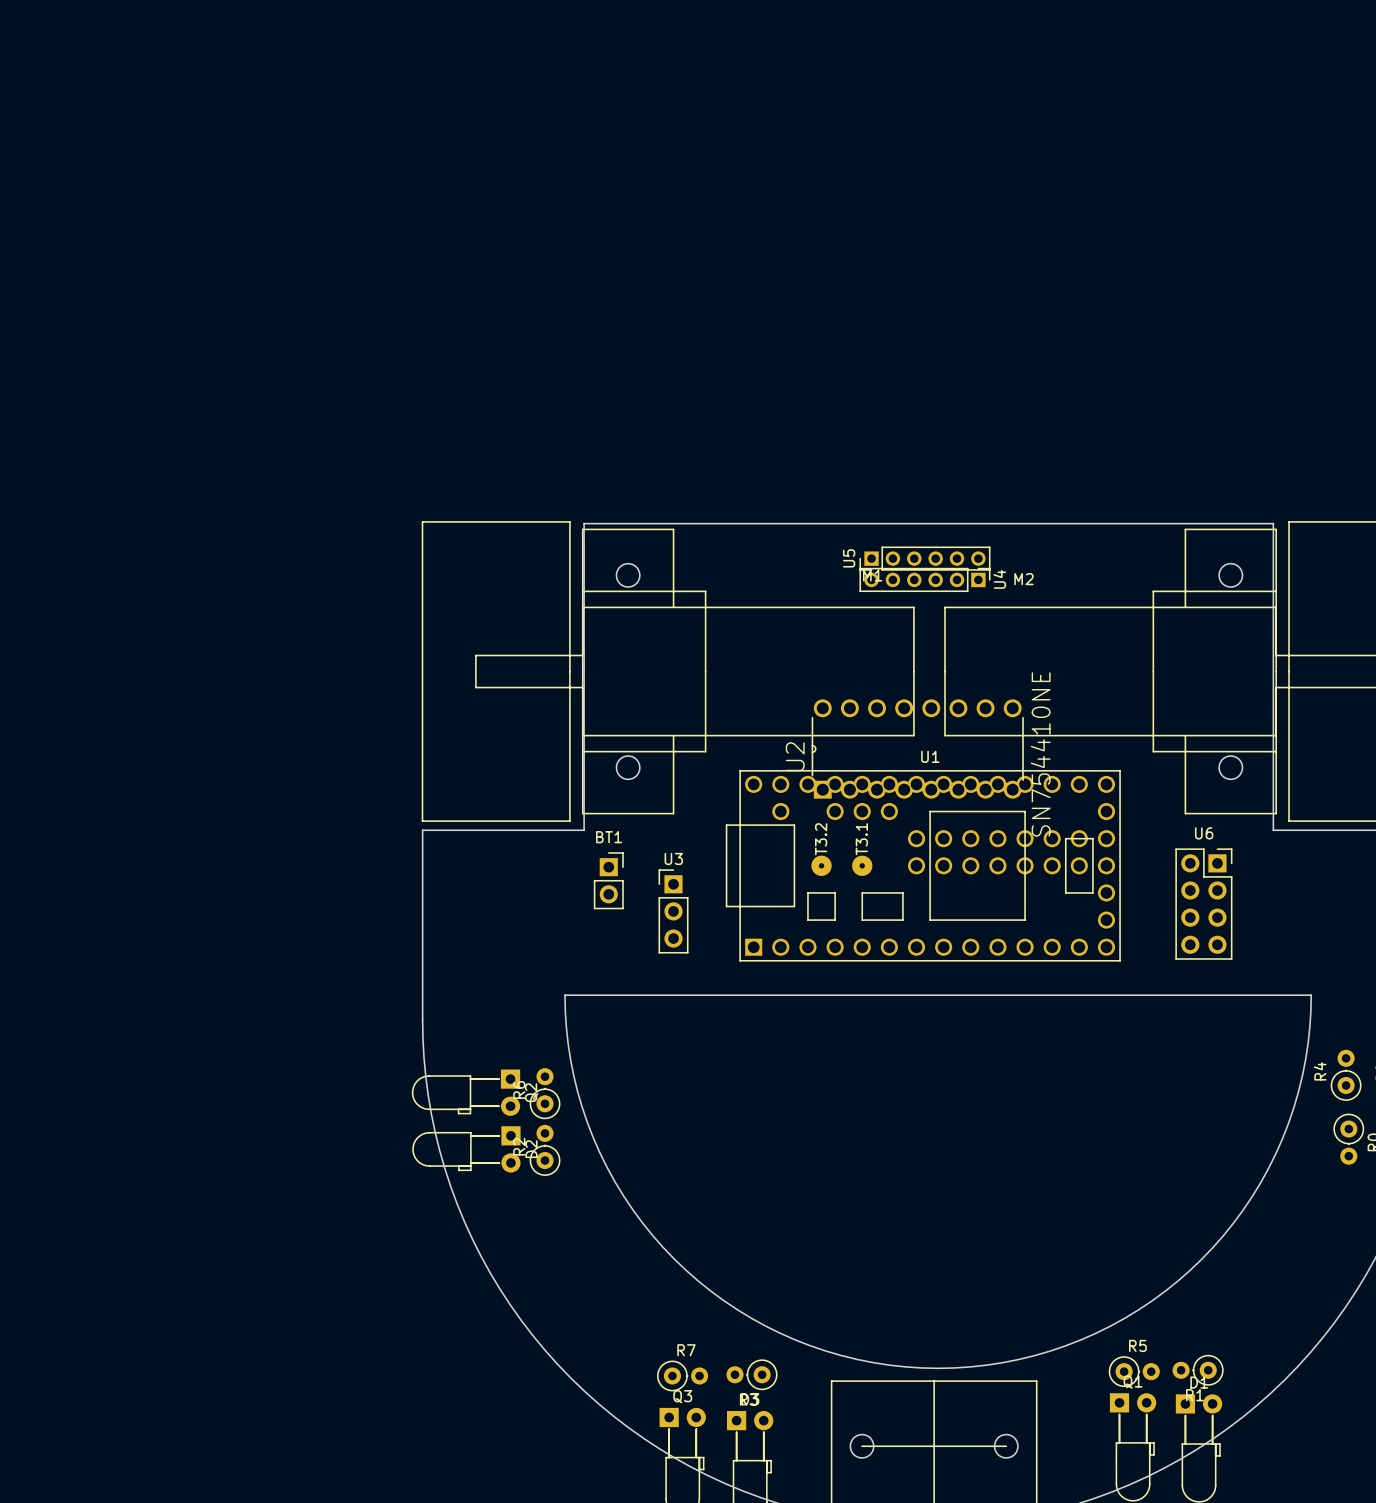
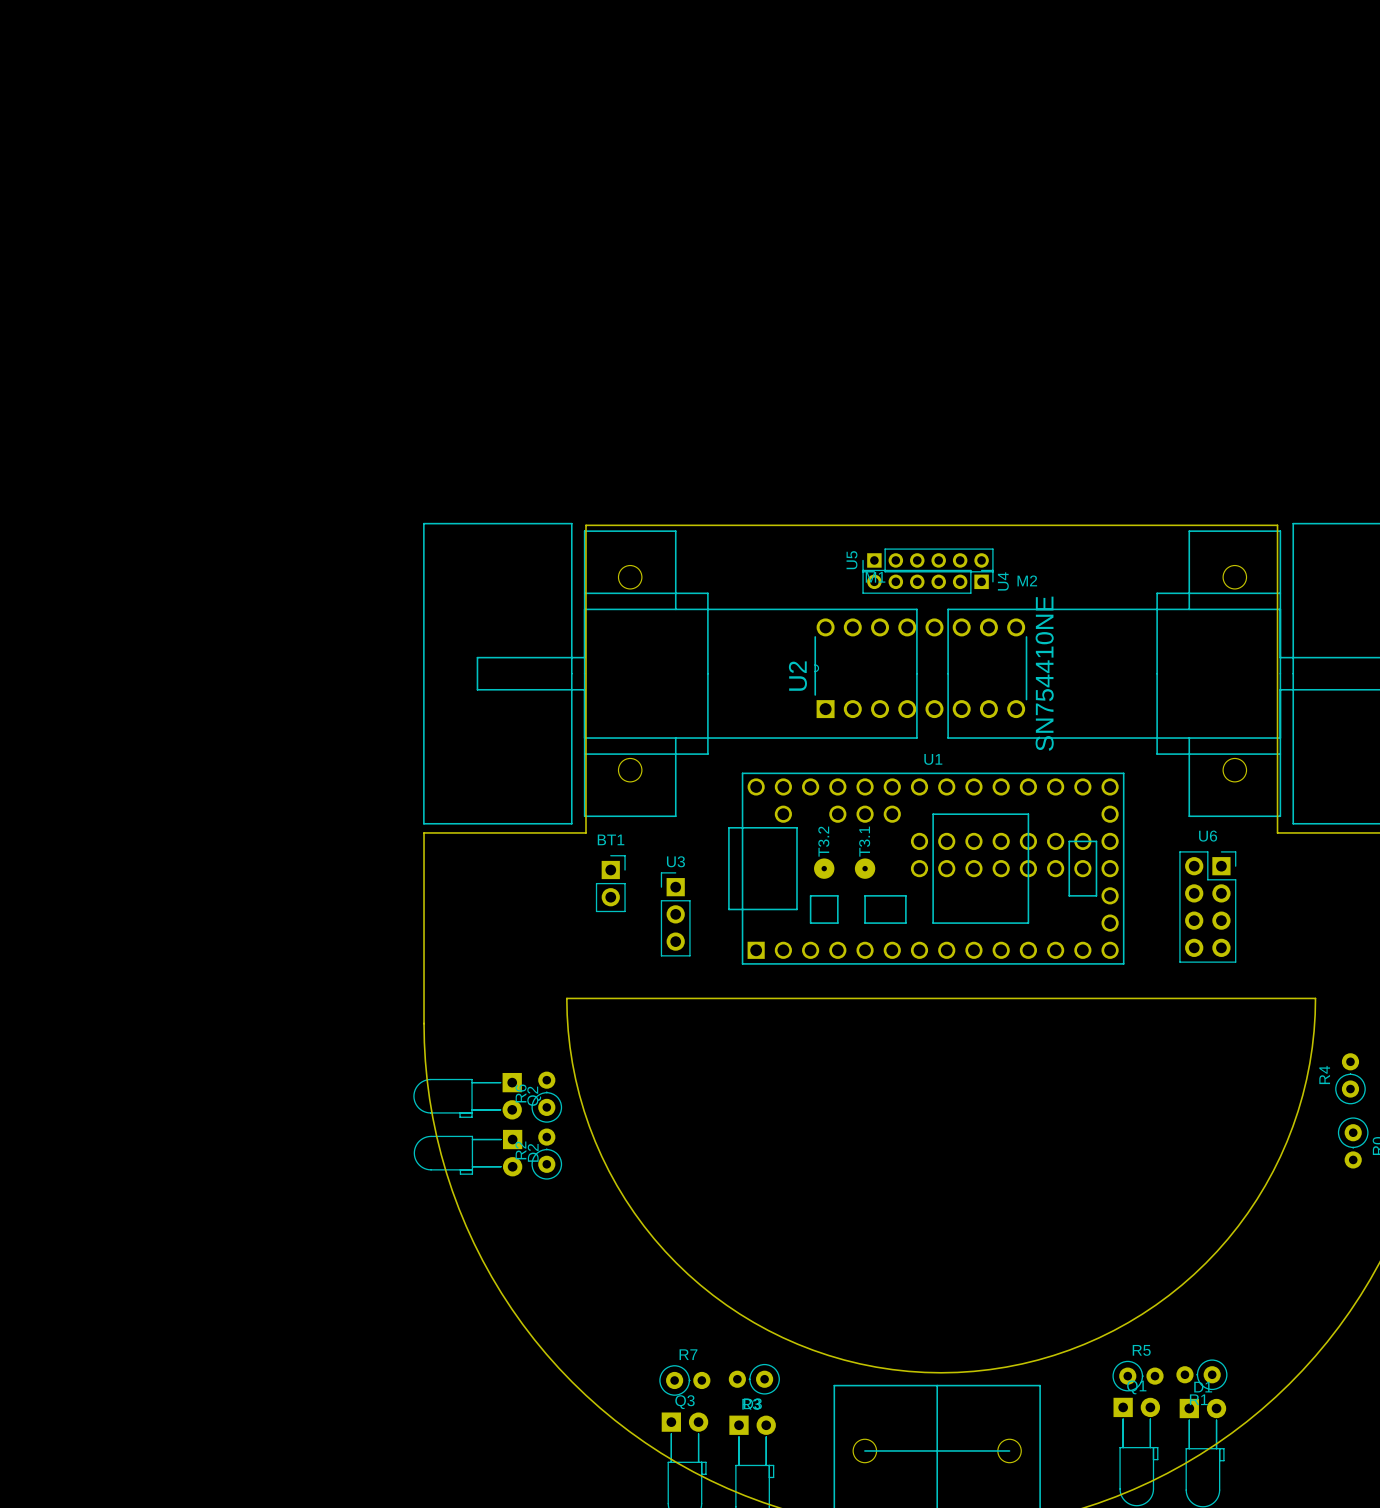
U2 position: (917, 748) -> (920, 668)

